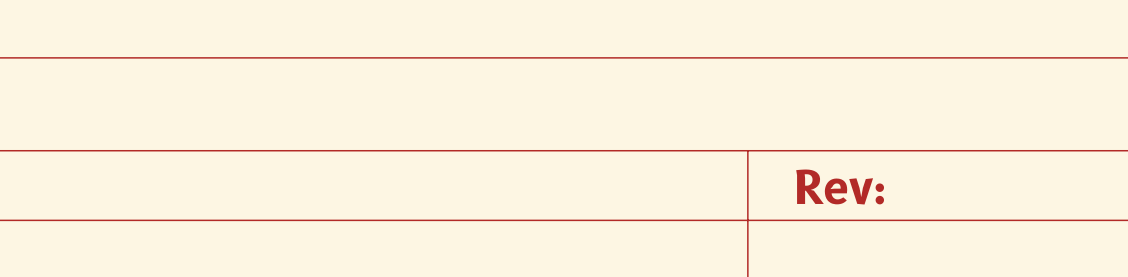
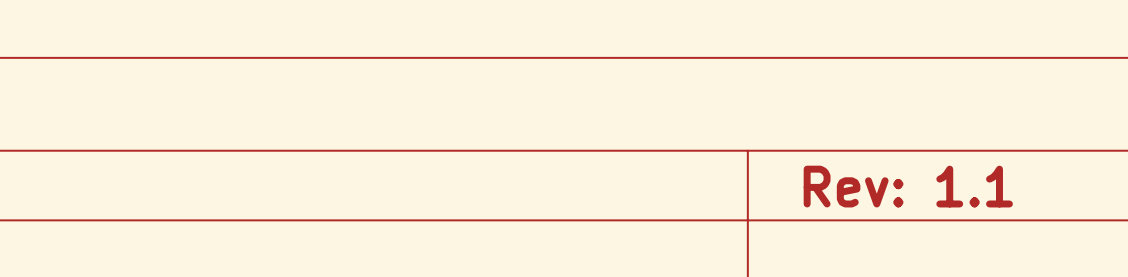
title block: Rev: (840, 187) -> Rev: 1.1 (908, 186)

